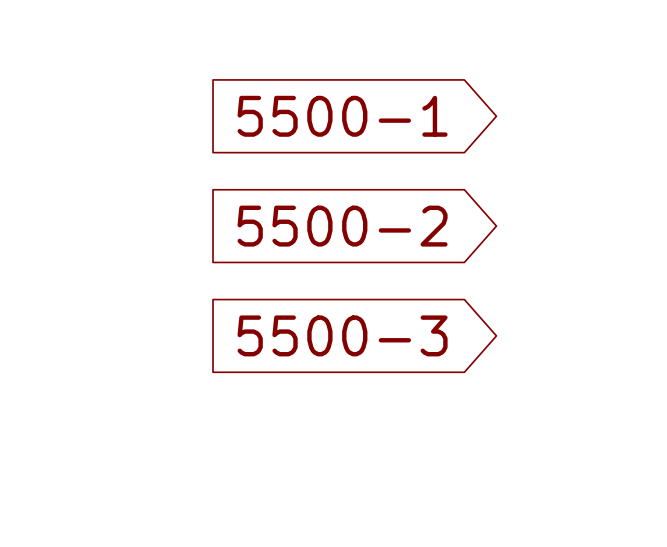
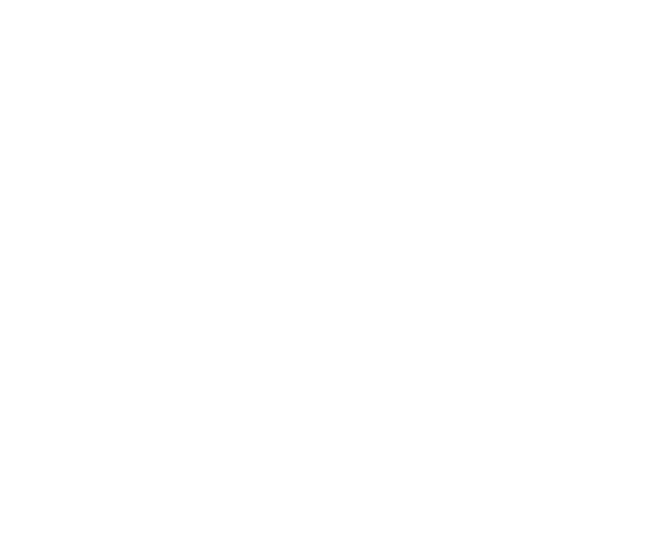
global label: 5500-1 (342, 116) -> none
global label: 5500-2 (342, 226) -> none
global label: 5500-3 (342, 335) -> none

